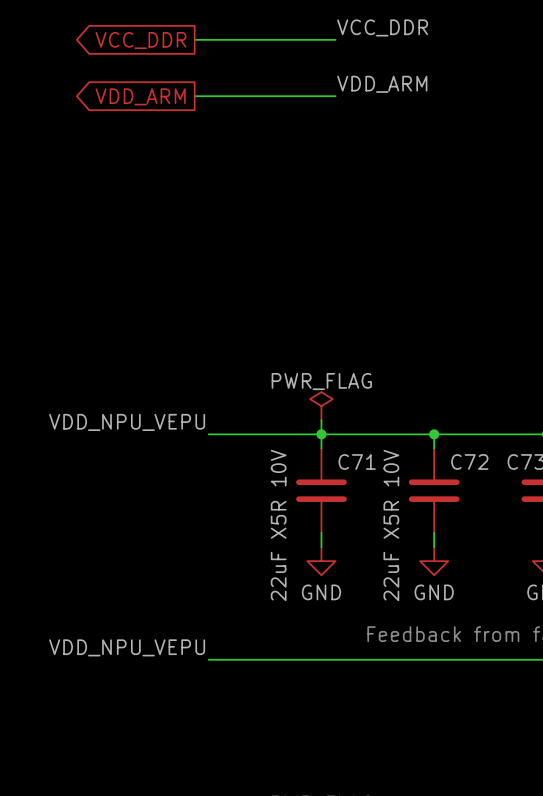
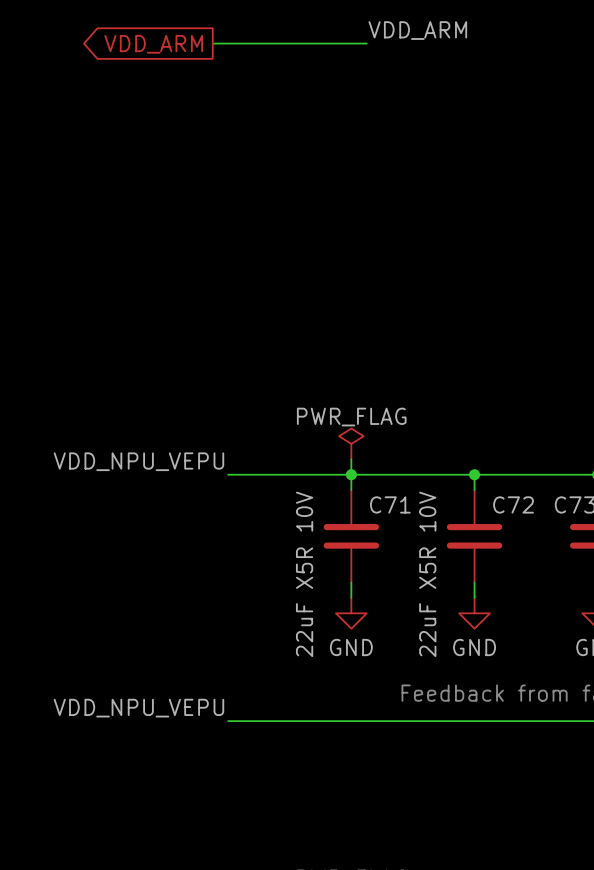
label: VCC_DDR (382, 27) -> VDD_ARM (417, 30)
global label: VCC_DDR (140, 40) -> VDD_ARM (153, 44)
label: VDD_ARM (382, 84) -> none
global label: VDD_ARM (140, 96) -> none
wire: (194, 96) (335, 96) -> none

